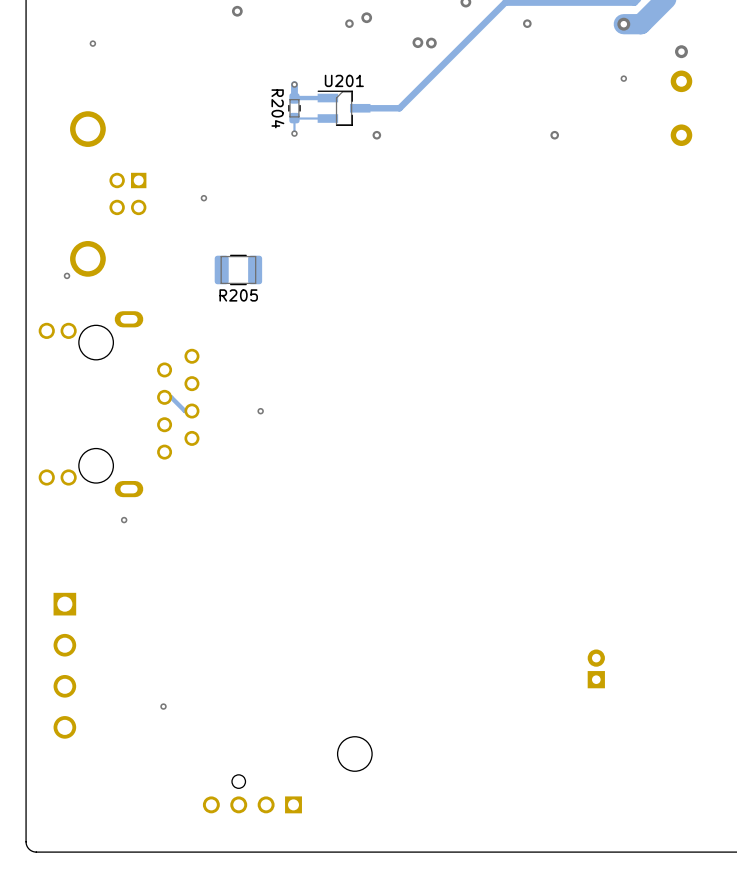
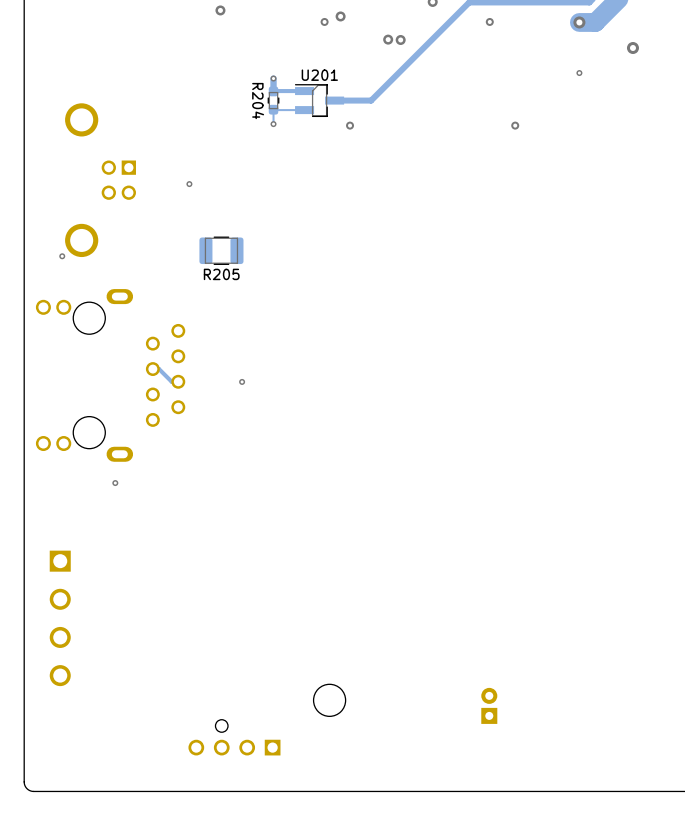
via: (92, 43) -> none
part: (681, 81) -> none
part: (681, 135) -> none
part position: (596, 668) -> (489, 705)
via: (163, 706) -> none

